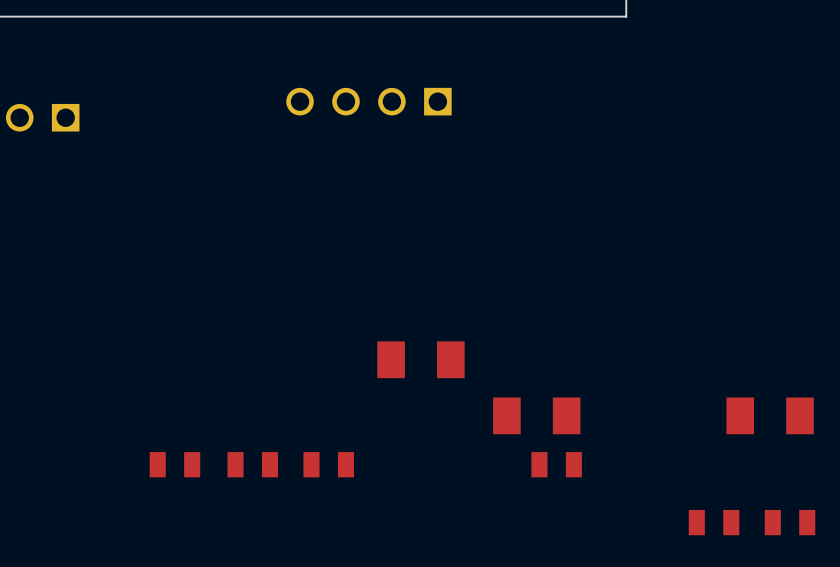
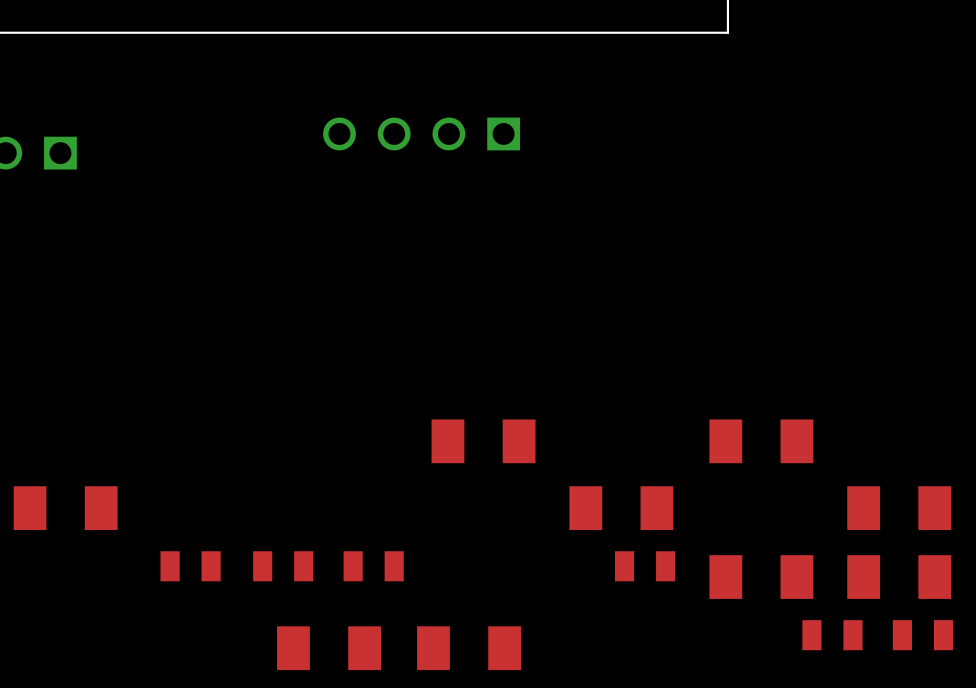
part: none -> (761, 441)
part: none -> (65, 508)
part: none -> (761, 577)
part: none -> (899, 577)
part: none -> (329, 648)
part: none -> (469, 648)

